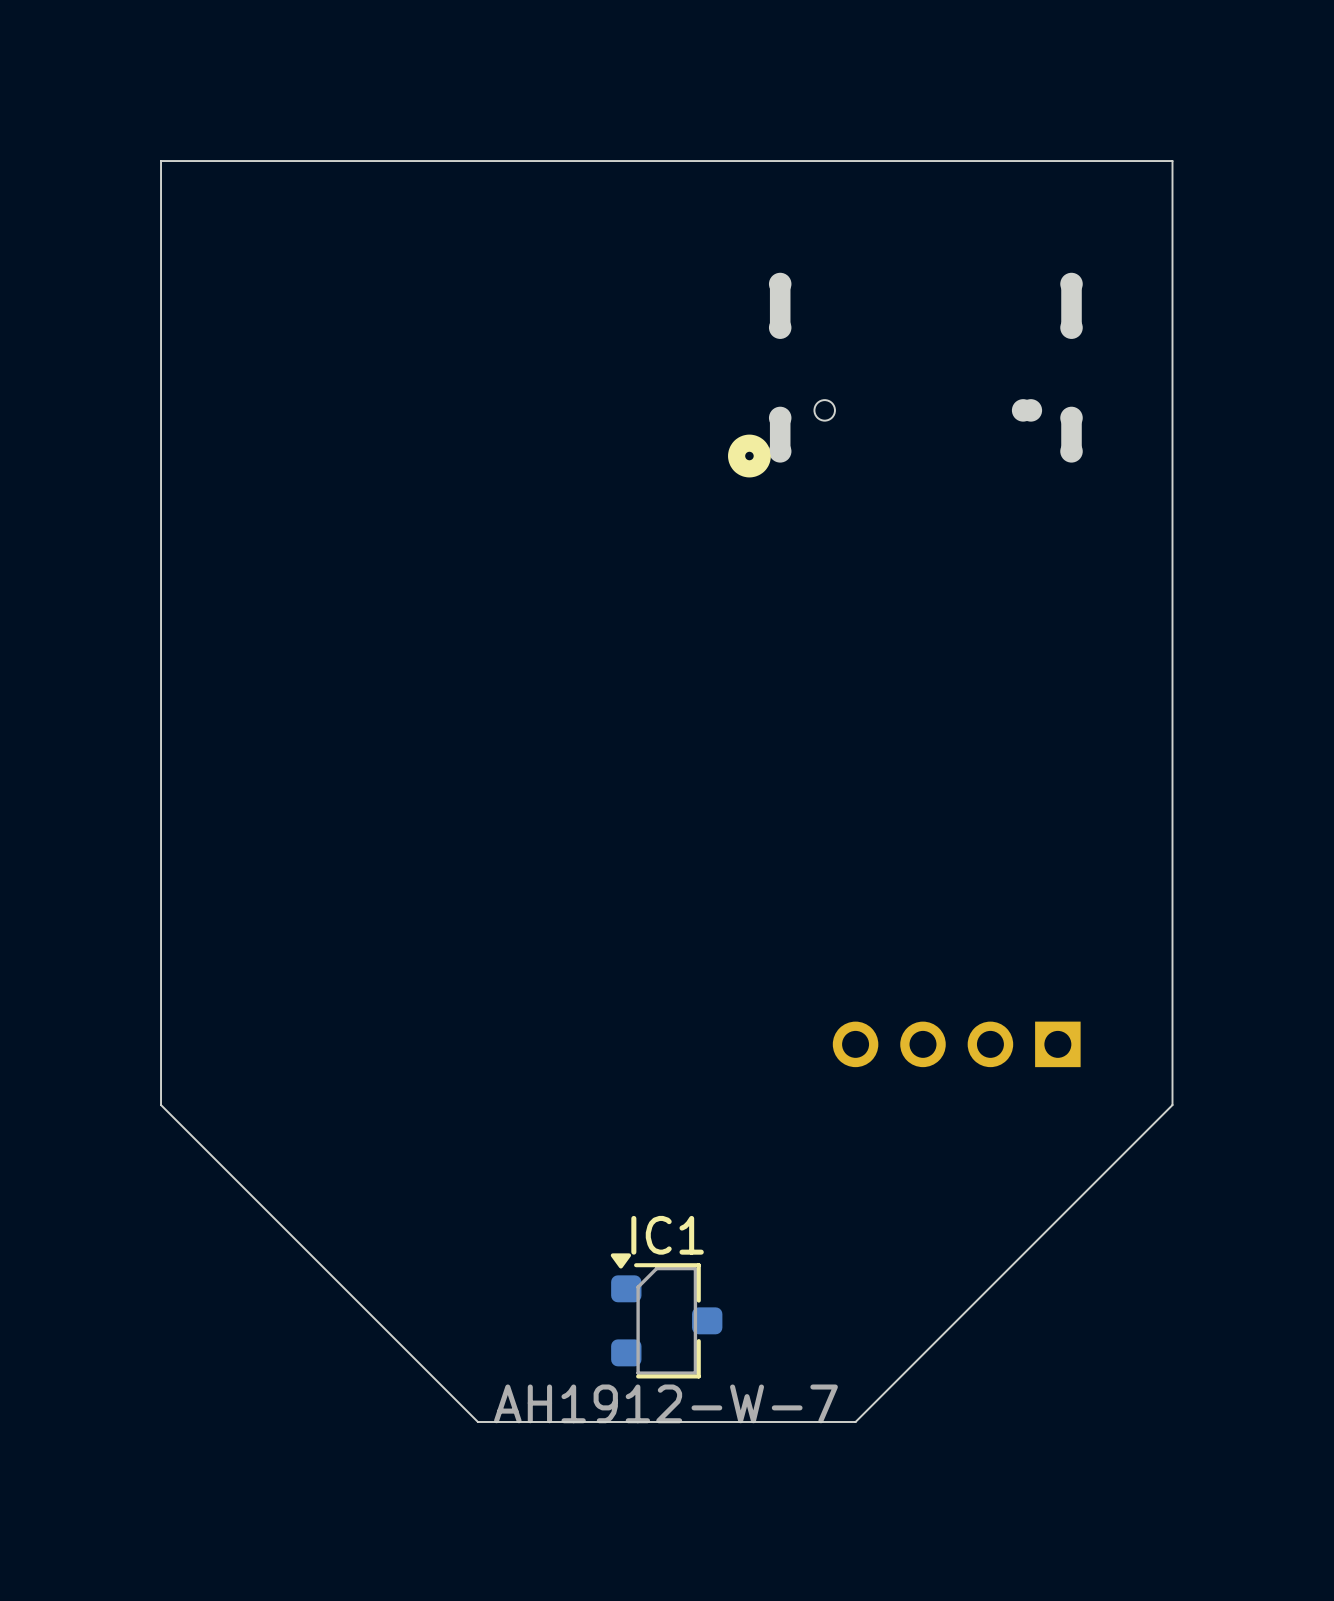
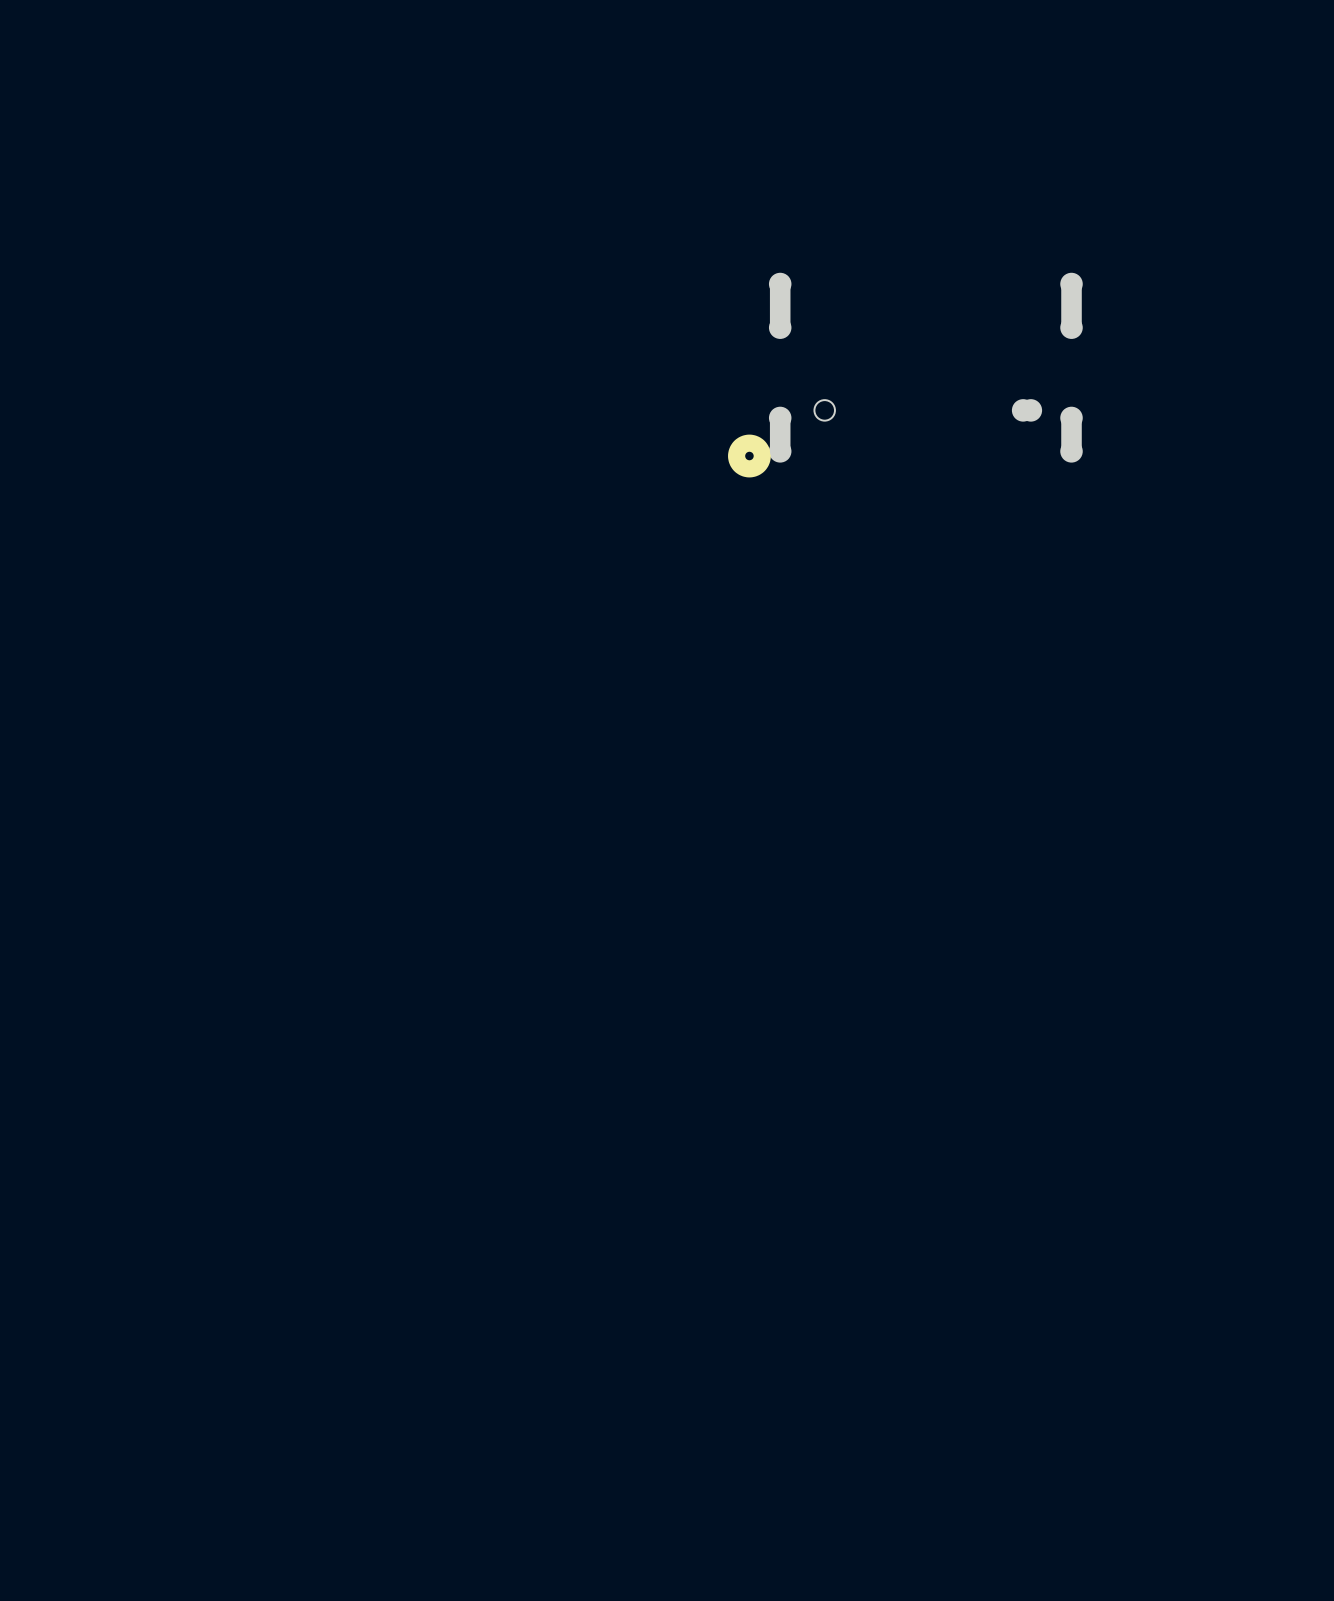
board edge: (1172, 161) (161, 161) (161, 1105) (477, 1421) (855, 1421) (1172, 1105) (1172, 161) -> none
part: (956, 1044) -> none
IC1: AH1912-W-7 (666, 1315) -> none

